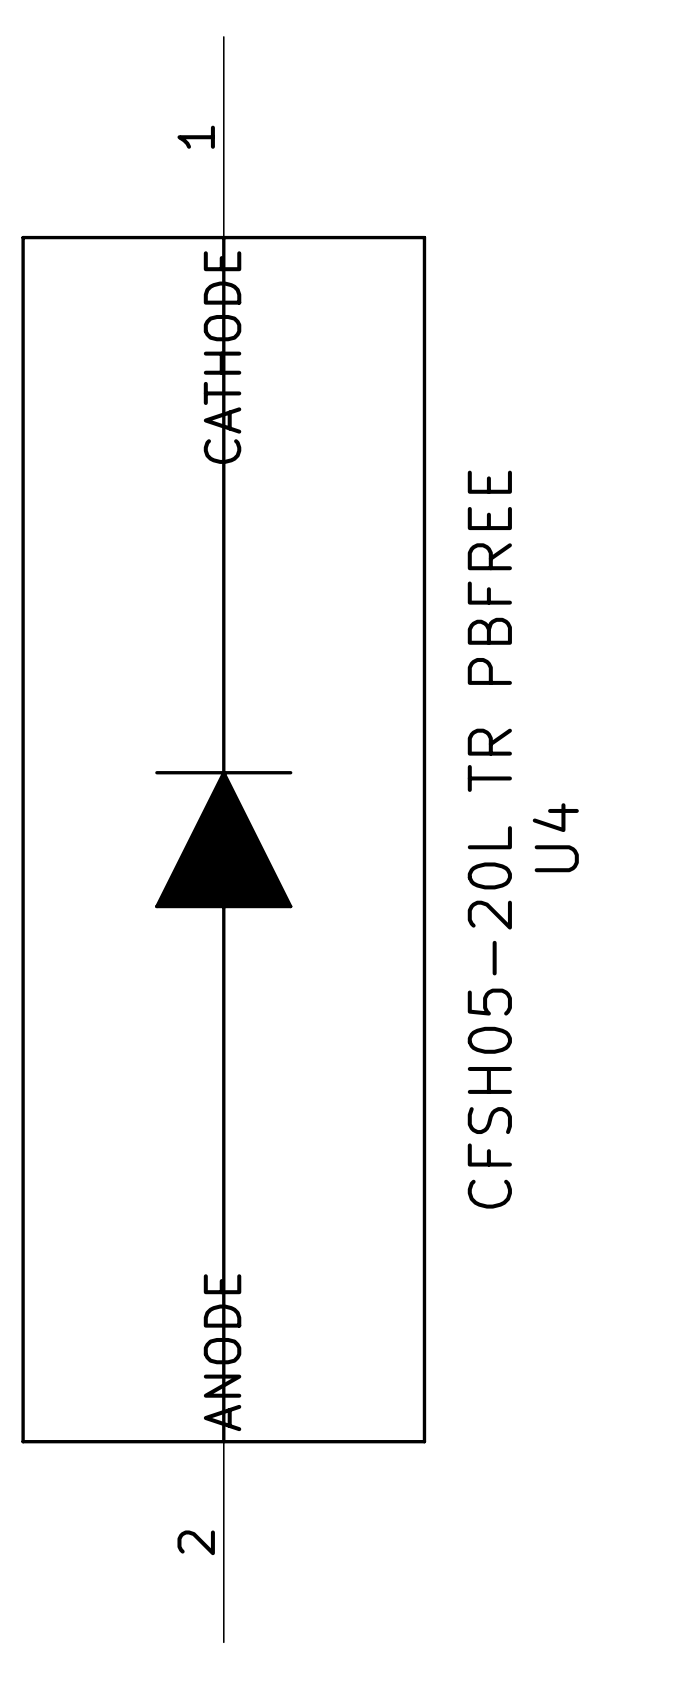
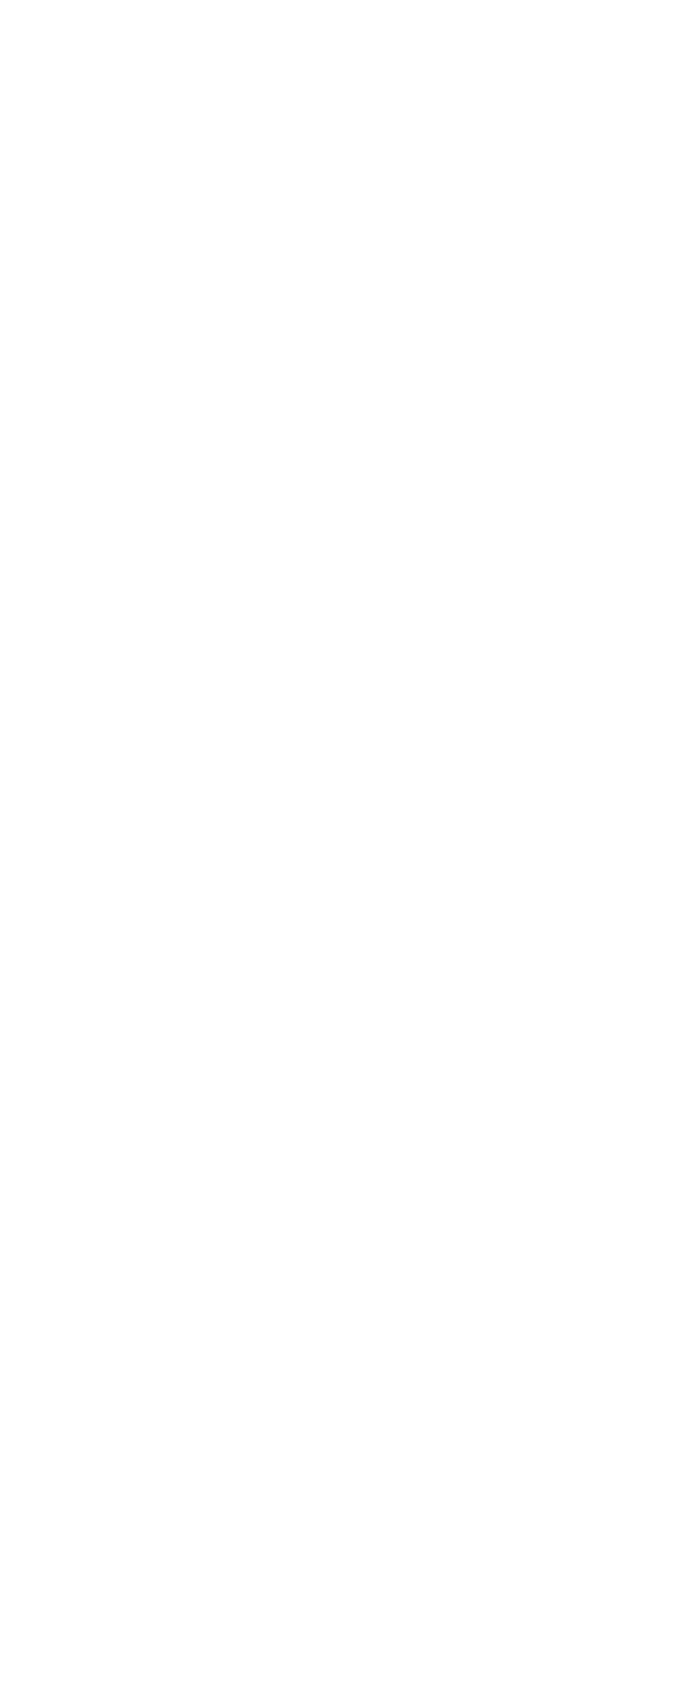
U4: CFSH05-20L TR PBFREE (223, 839) -> none

